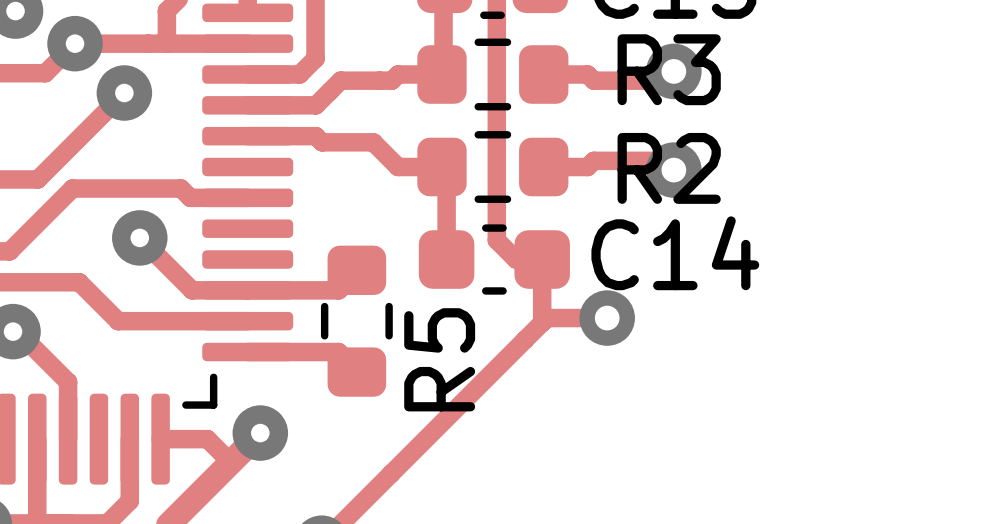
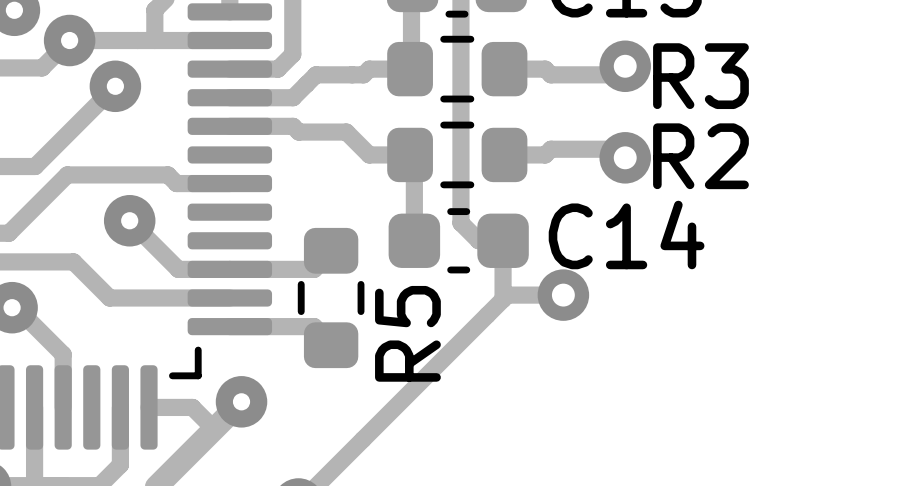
R3 name position: R3 (669, 69) -> R3 (700, 76)
R2 name position: R2 (669, 168) -> R2 (700, 156)

